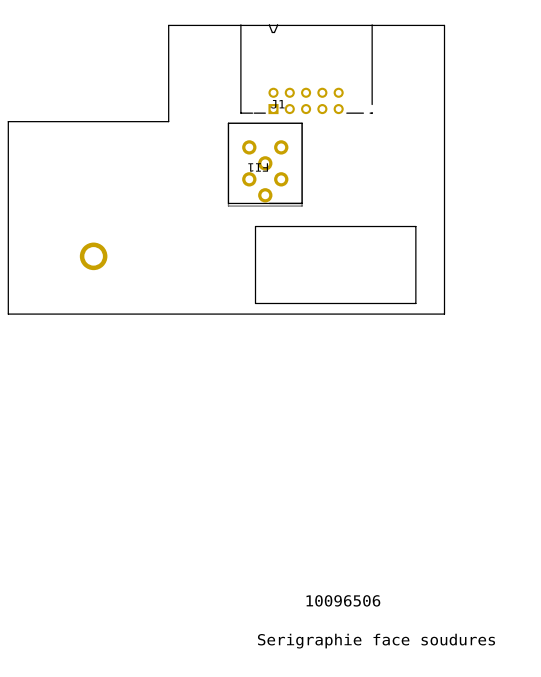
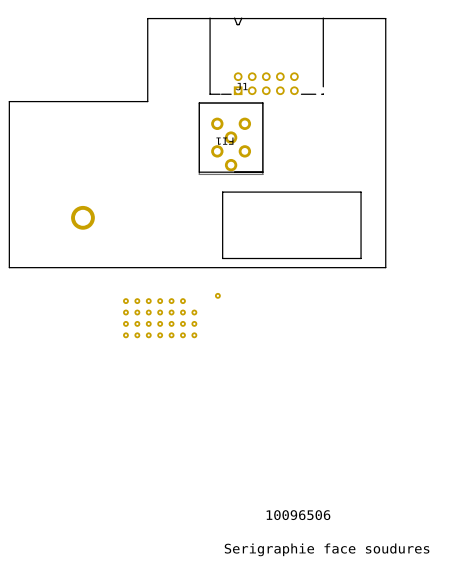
part: none -> (217, 295)
part: none -> (125, 301)
part: none -> (137, 301)
part: none -> (148, 301)
part: none -> (160, 301)
part: none -> (171, 301)
part: none -> (182, 301)
part: none -> (125, 312)
part: none -> (137, 312)
part: none -> (148, 312)
part: none -> (160, 312)
part: none -> (171, 312)
part: none -> (182, 312)
part: none -> (194, 312)
part: none -> (125, 323)
part: none -> (137, 323)
part: none -> (148, 323)
part: none -> (160, 323)
part: none -> (171, 323)
part: none -> (182, 323)
part: none -> (194, 323)
part: none -> (125, 335)
part: none -> (137, 335)
part: none -> (148, 335)
part: none -> (160, 335)
part: none -> (171, 335)
part: none -> (182, 335)
part: none -> (194, 335)

